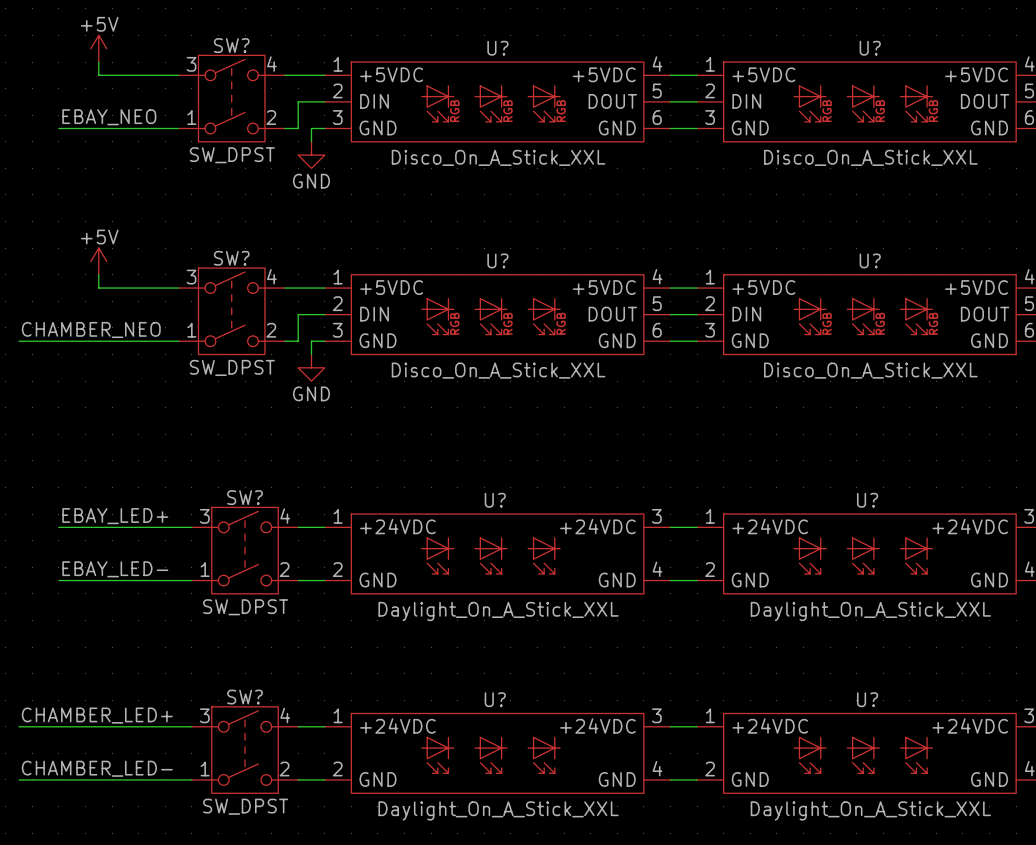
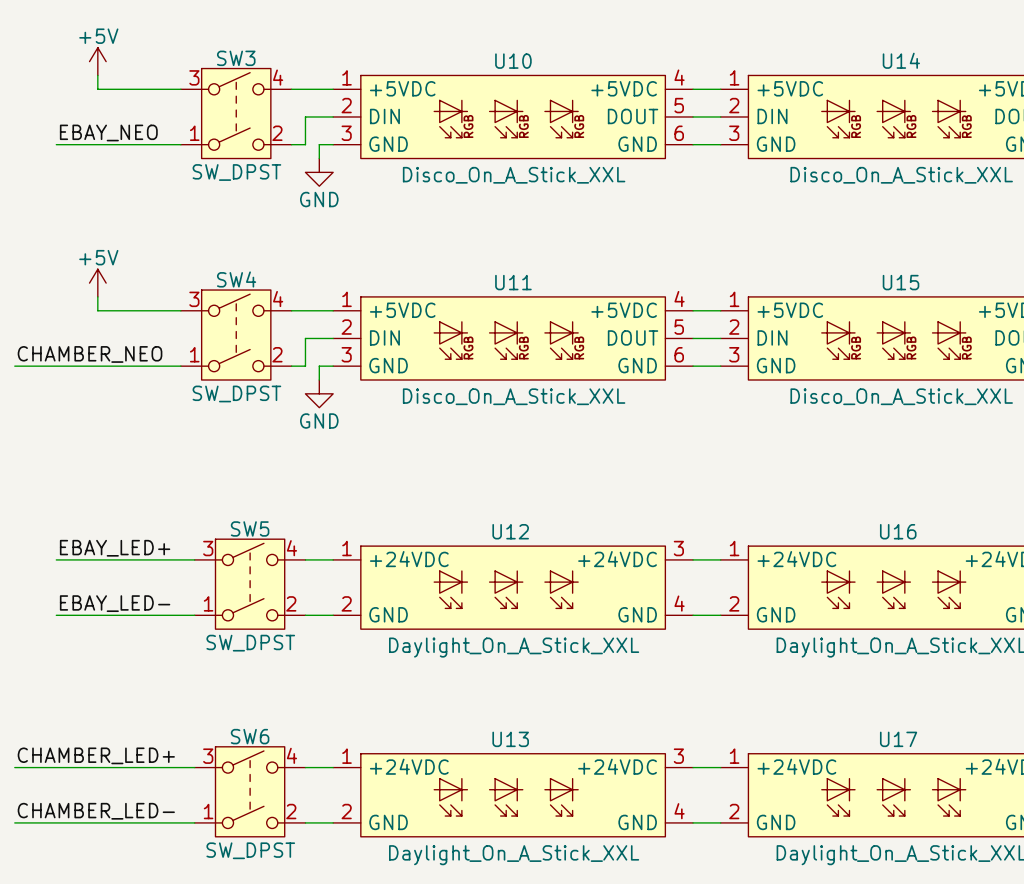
SW? name: SW? (231, 45) -> SW3 (236, 58)
U? name: U? (497, 48) -> U10 (513, 61)
U? name: U? (870, 48) -> U14 (901, 60)
SW? name: SW? (231, 258) -> SW4 (236, 279)
U? name: U? (497, 260) -> U11 (513, 282)
U? name: U? (870, 260) -> U15 (901, 282)
SW? name: SW? (245, 497) -> SW5 (250, 528)
U? name: U? (495, 500) -> U12 (510, 531)
U? name: U? (867, 500) -> U16 (898, 531)
SW? name: SW? (245, 697) -> SW6 (250, 736)
U? name: U? (495, 699) -> U13 (510, 739)
U? name: U? (867, 699) -> U17 (898, 739)

